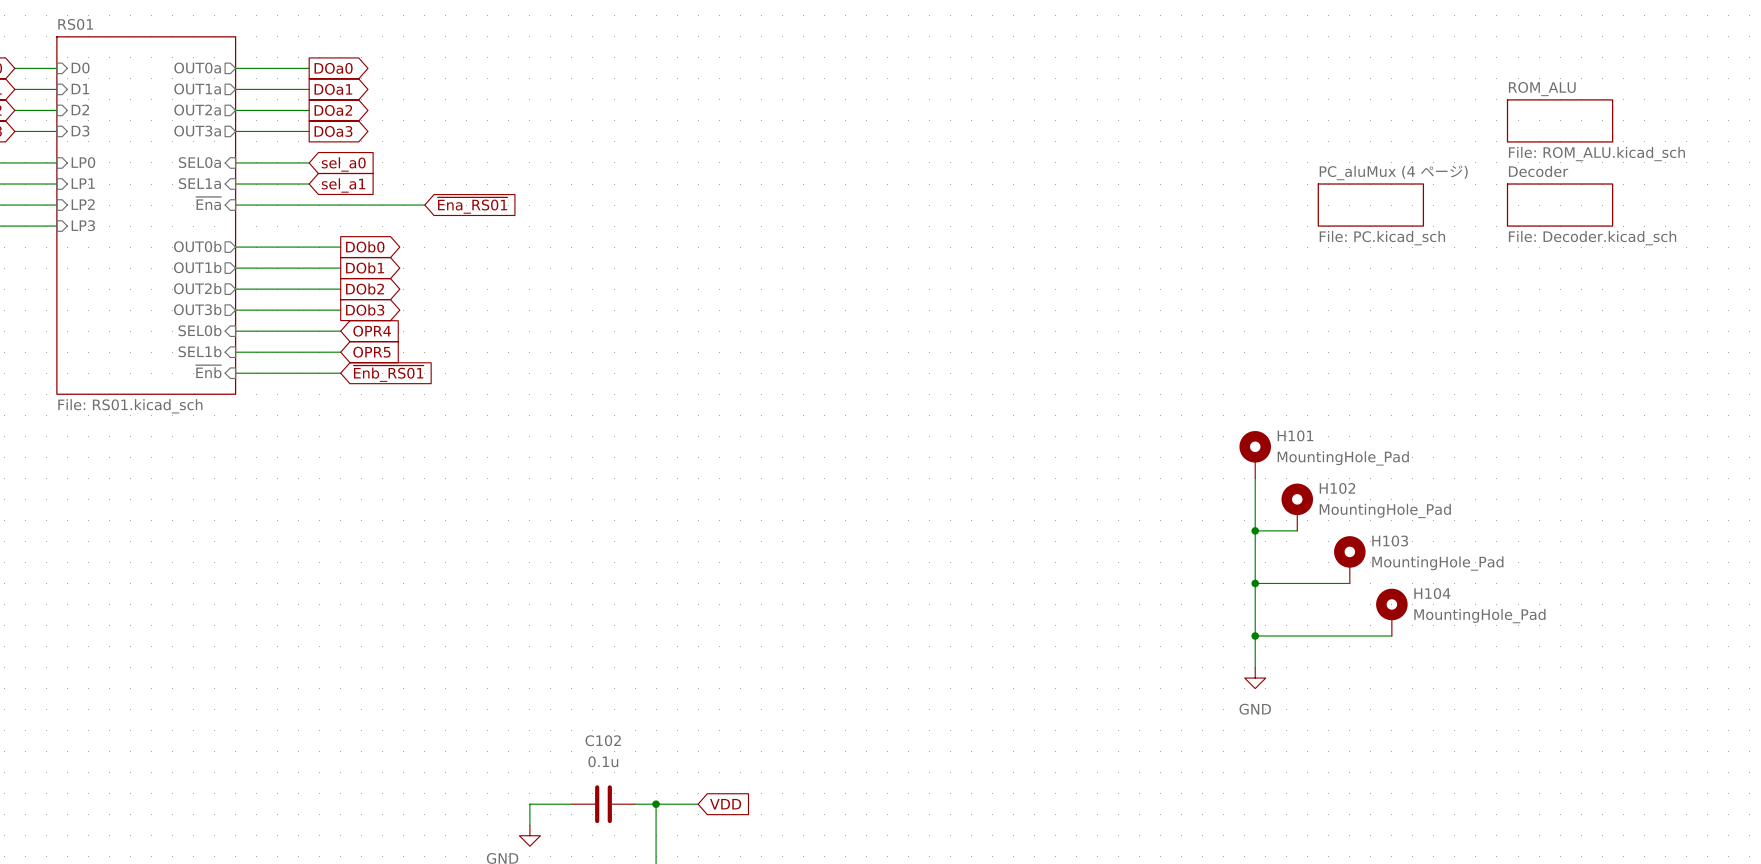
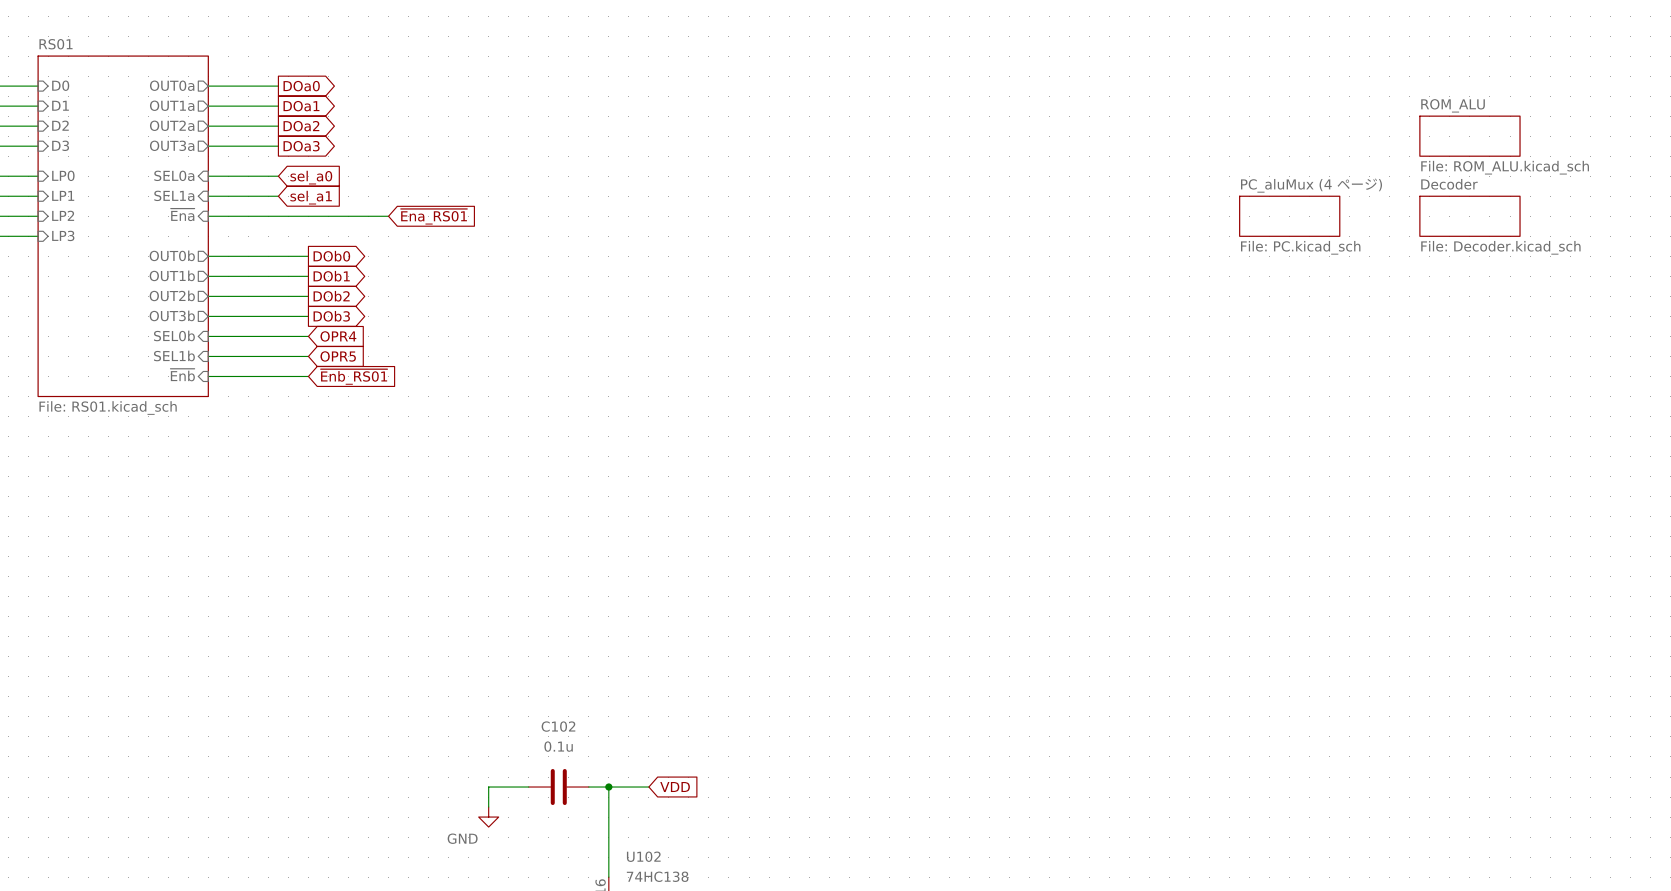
H101: MountingHole_Pad (1255, 454) -> none
wire: (1255, 478) (1255, 667) -> none
H102: MountingHole_Pad (1297, 507) -> none
wire: (1255, 530) (1297, 530) -> none
junction: (1255, 530) -> none
H103: MountingHole_Pad (1349, 559) -> none
wire: (1255, 583) (1349, 583) -> none
junction: (1255, 583) -> none
H104: MountingHole_Pad (1391, 612) -> none
wire: (1255, 636) (1391, 636) -> none
junction: (1255, 636) -> none
power symbol: GND (1255, 678) -> none

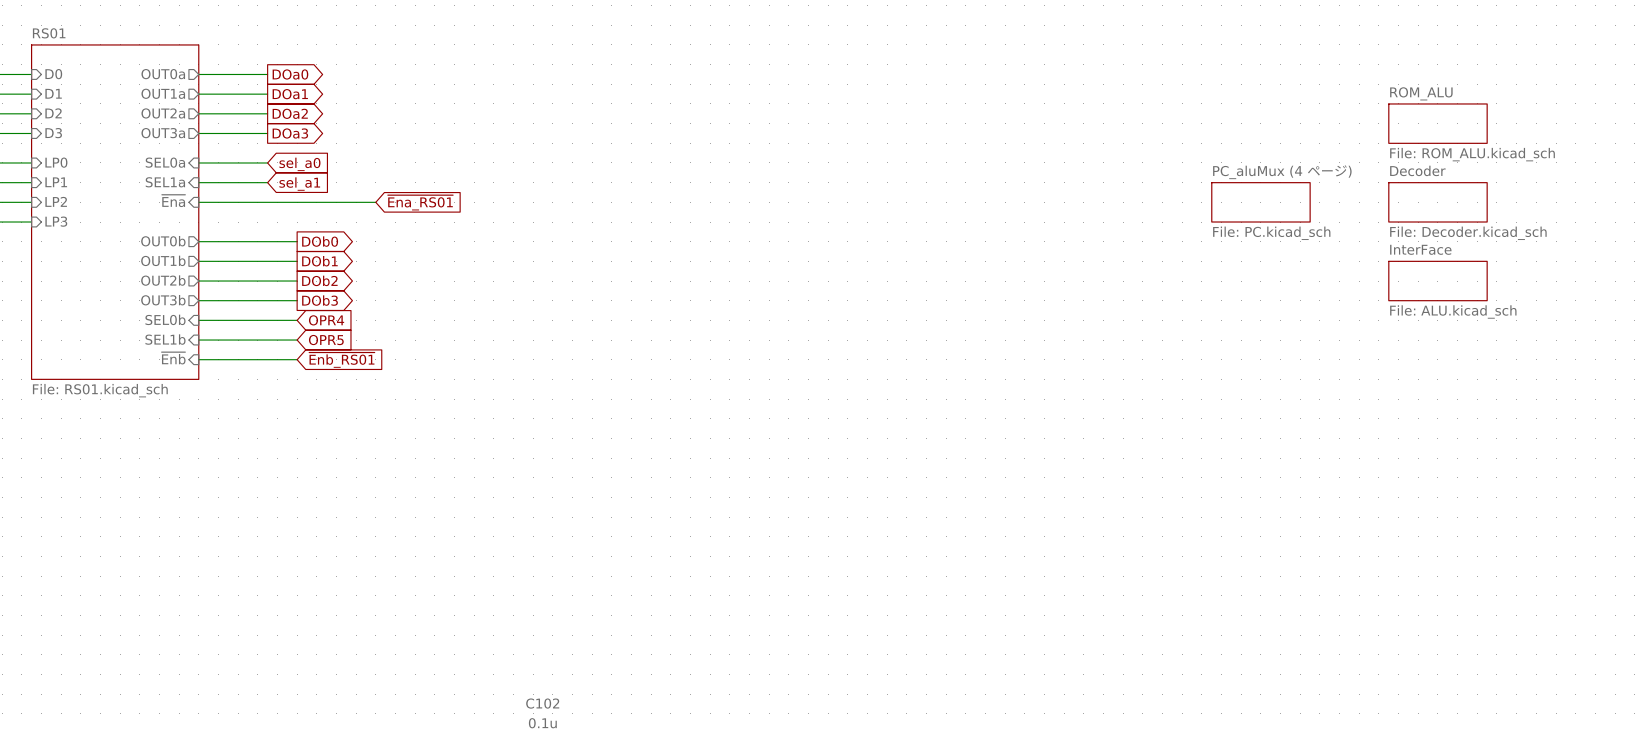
sheet InterFace: none -> File: ALU.kicad_sch (1437, 281)

